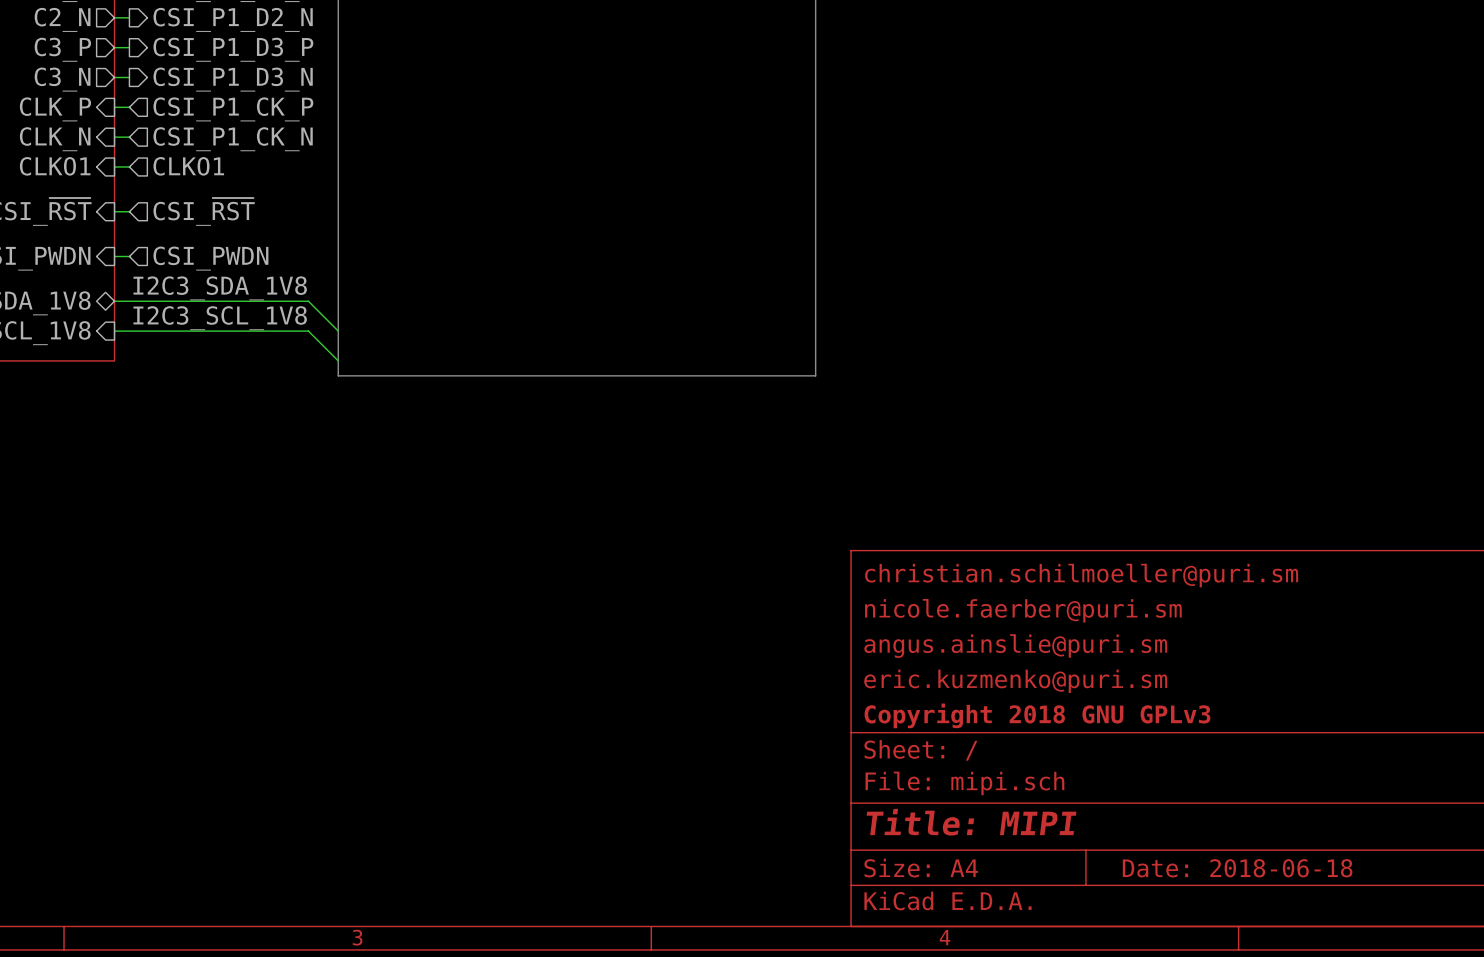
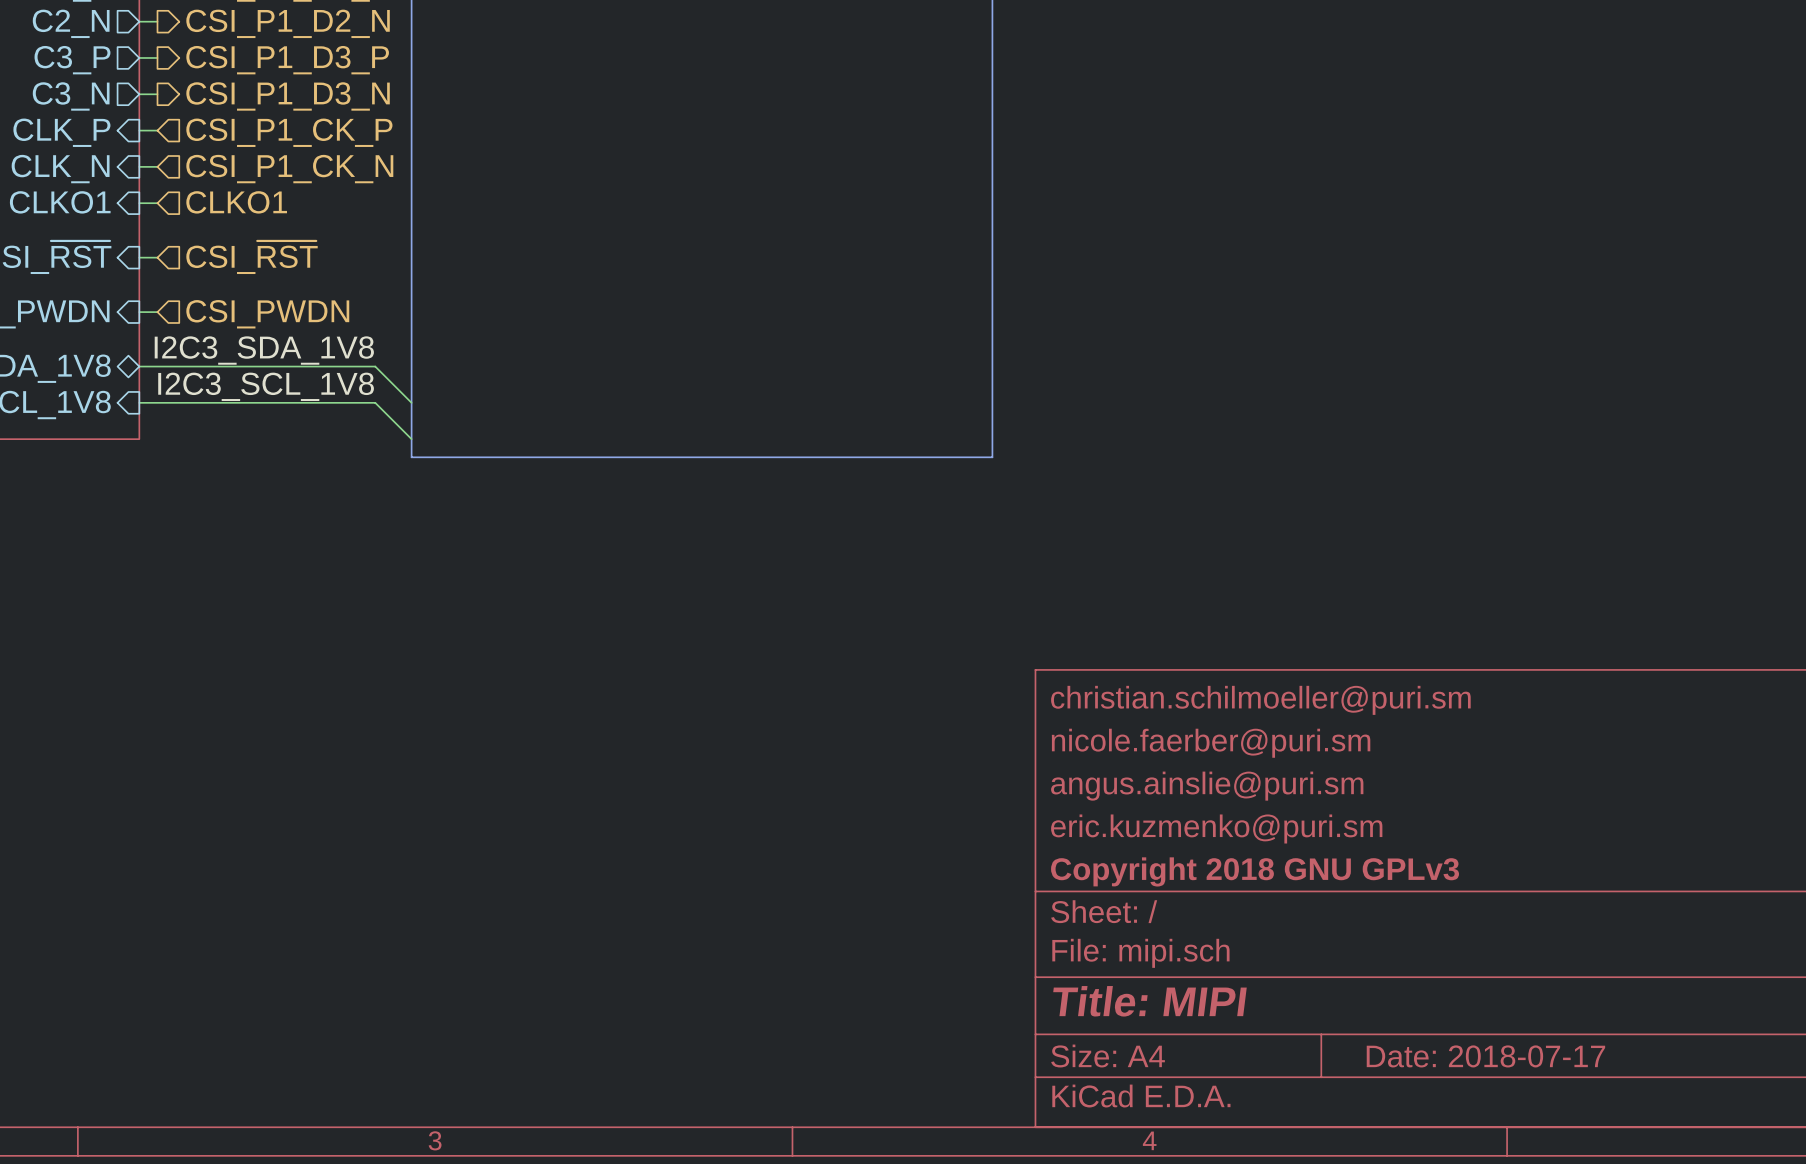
title block: Date: 2018-06-18 (1237, 868) -> Date: 2018-07-17 (1485, 1056)

